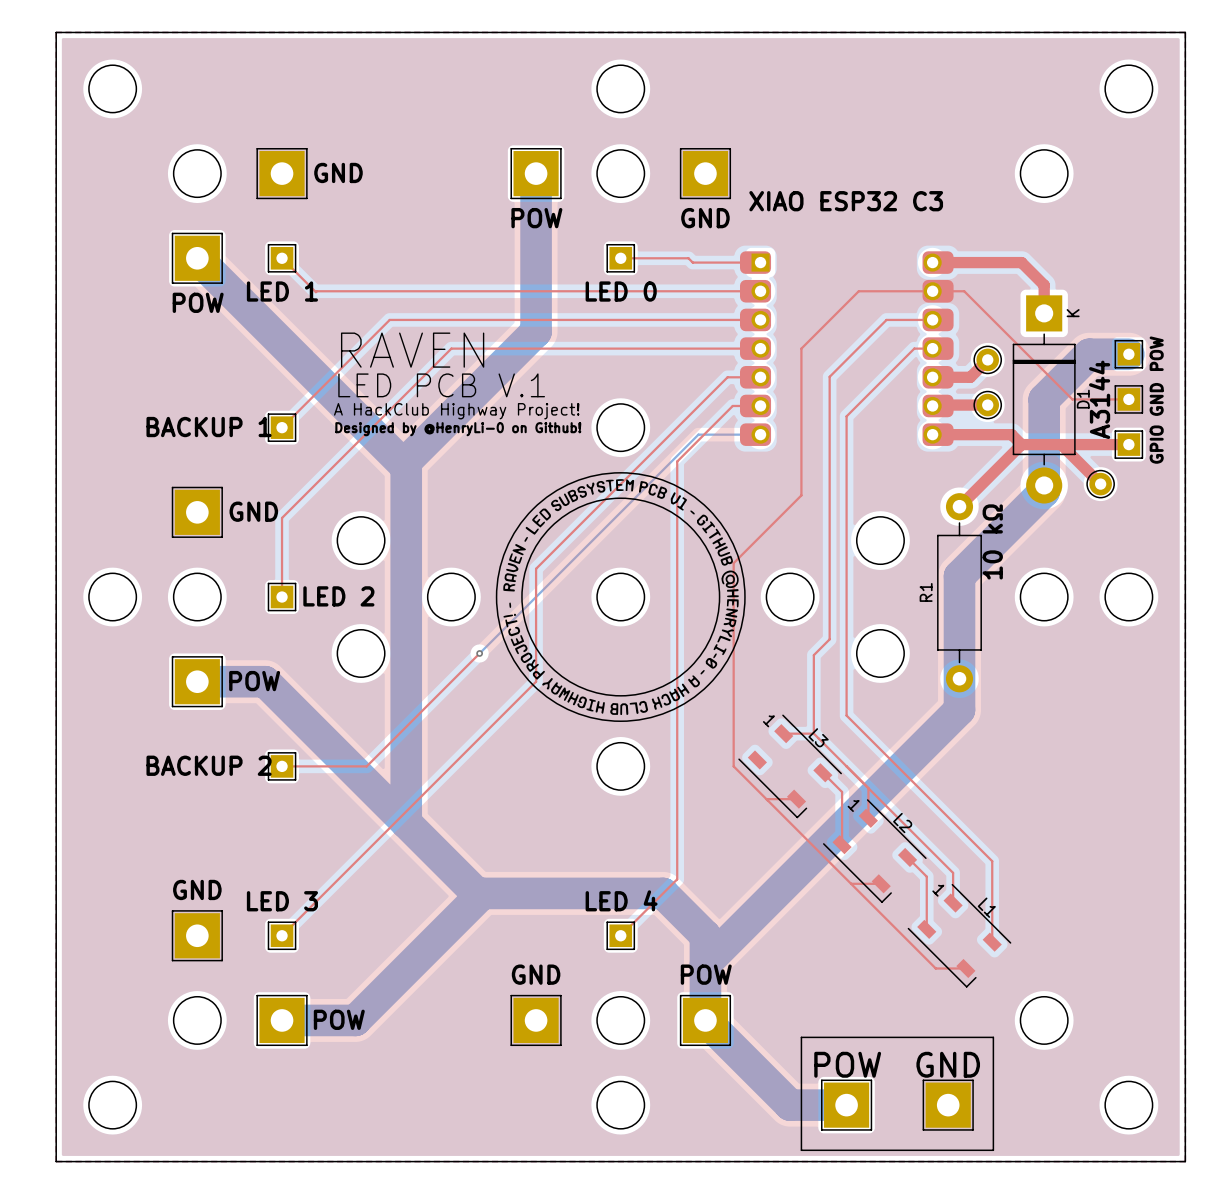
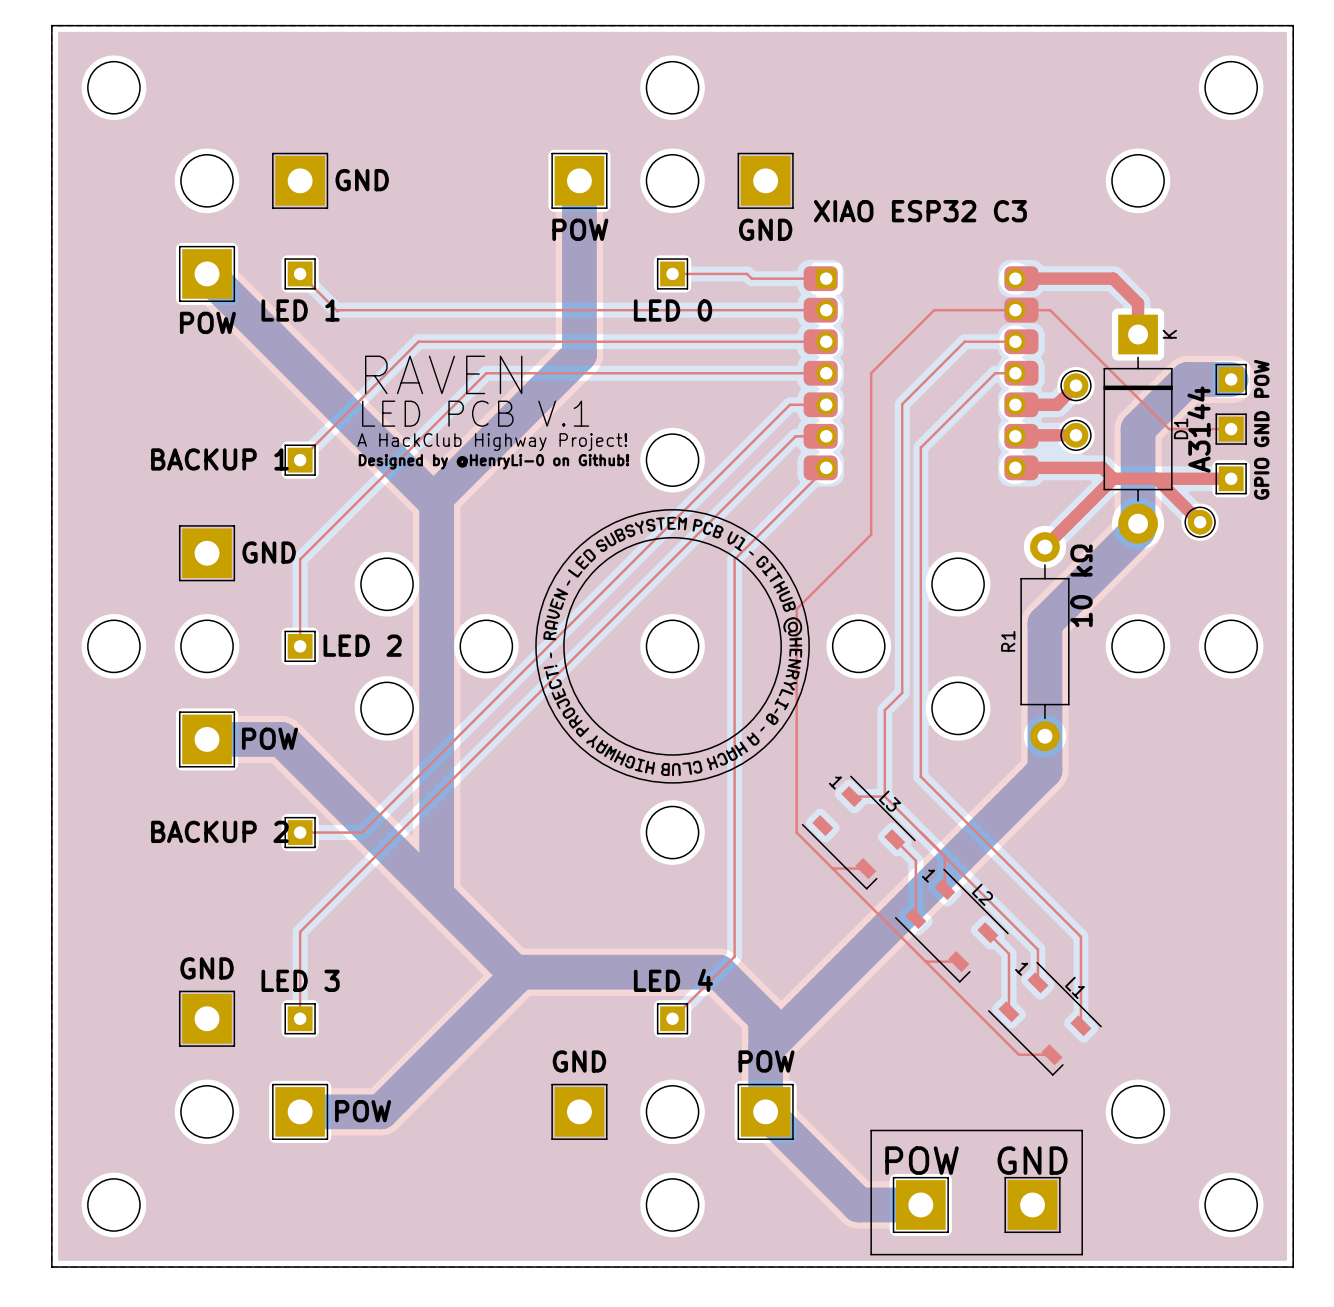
bottom track: (760, 434) (698, 434) (479, 653) -> none
top track: (677, 461) (677, 517) -> (826, 467) (734, 559)
top track: (536, 568) (536, 681) (282, 935) -> (734, 497) (300, 931) (300, 1018)
top track: (479, 653) (366, 766) (338, 766) -> (579, 615) (362, 832)
via: (479, 653) -> none

